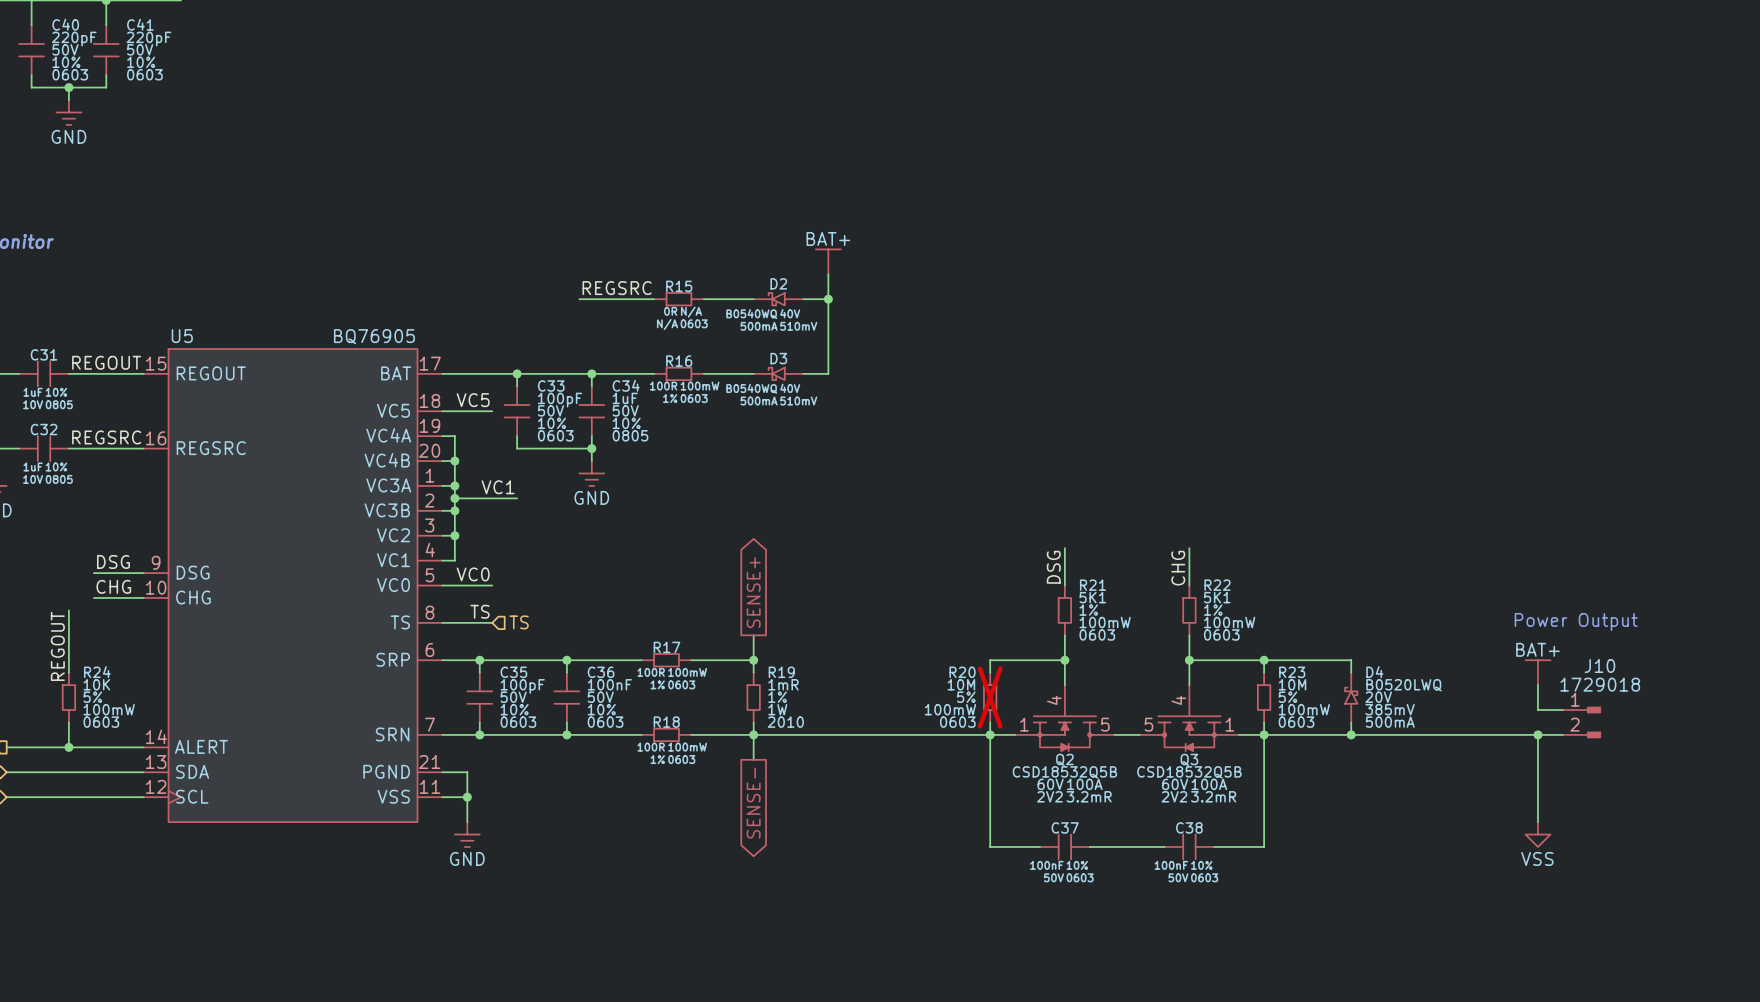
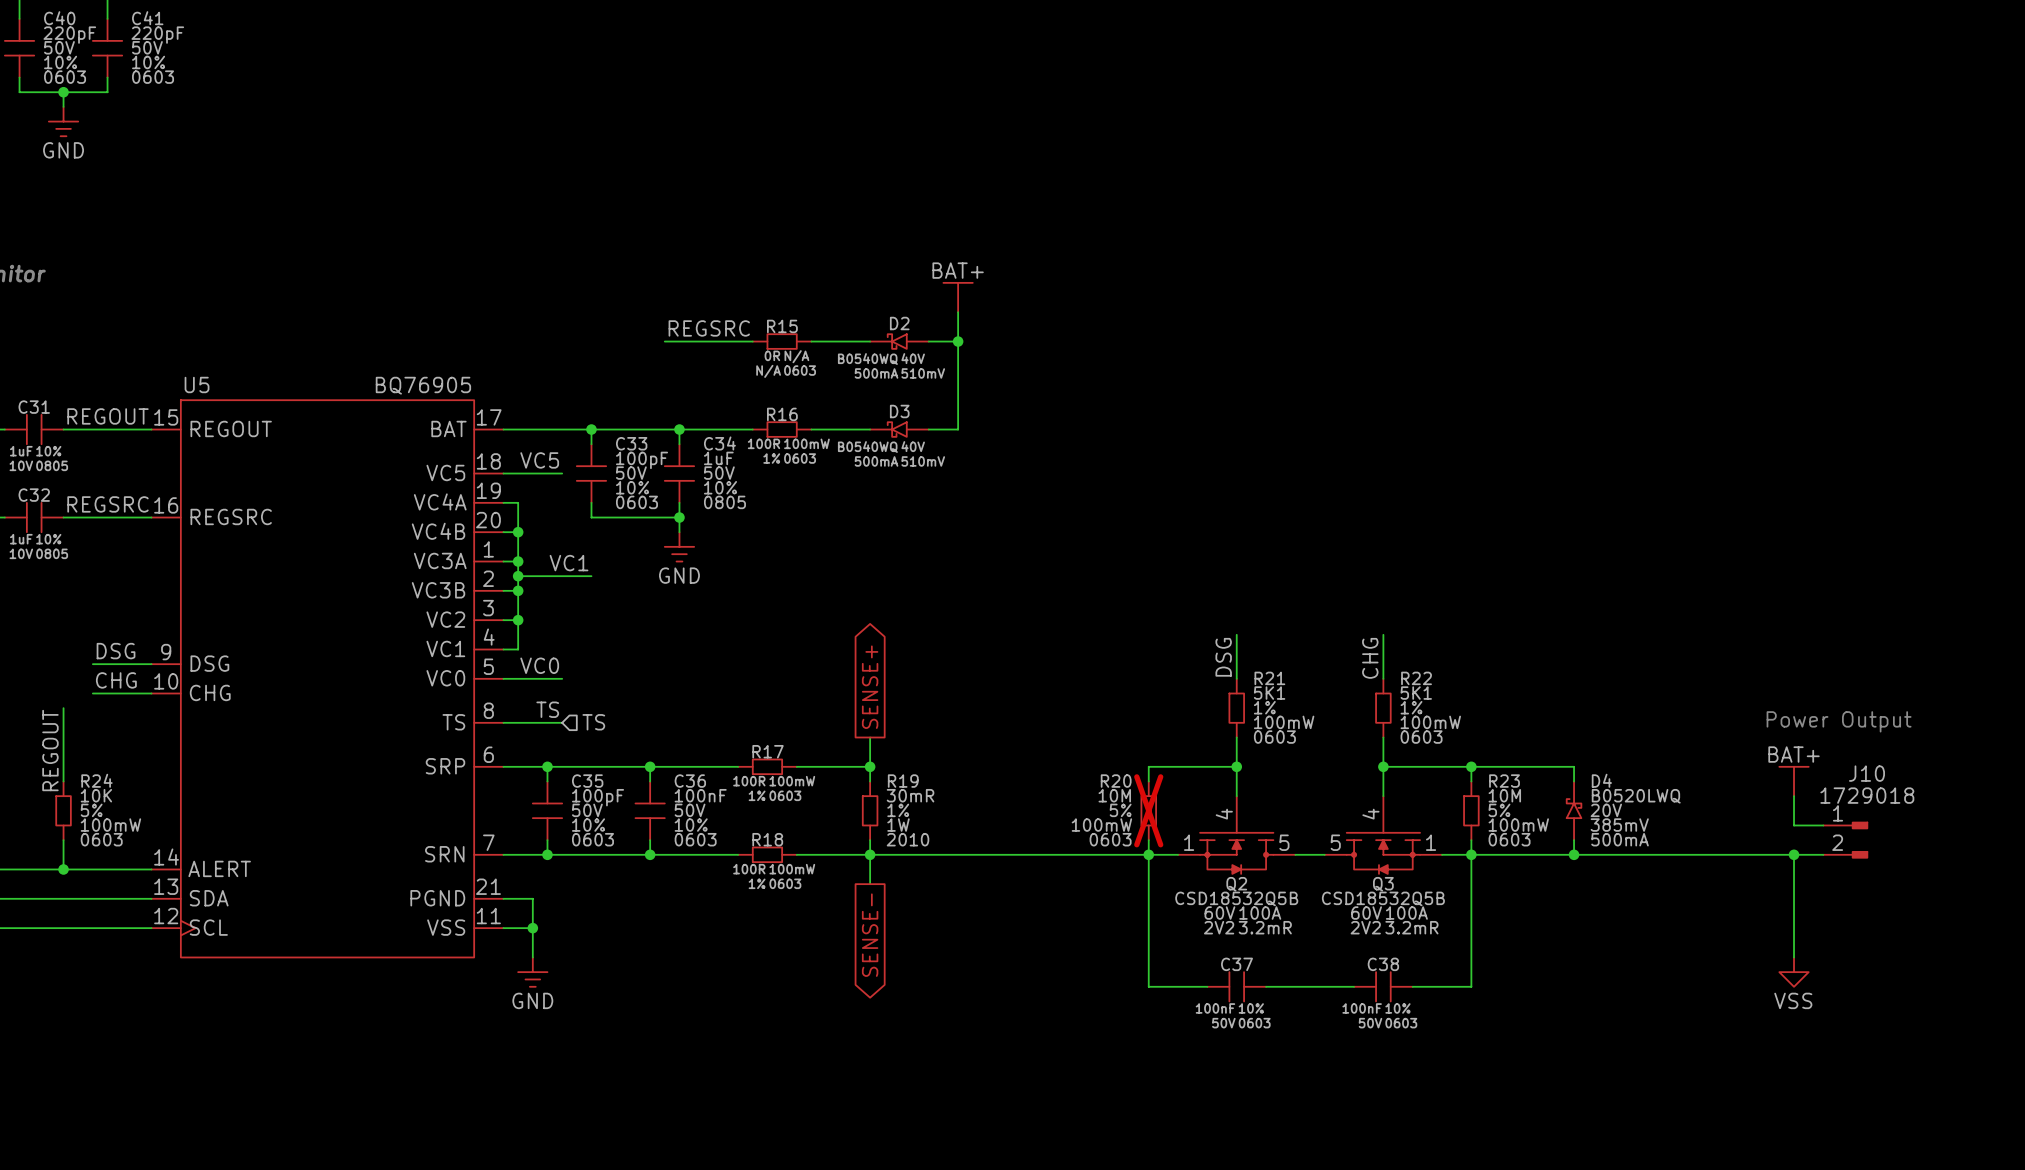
R19 value: 1mR (783, 684) -> 30mR (910, 795)

